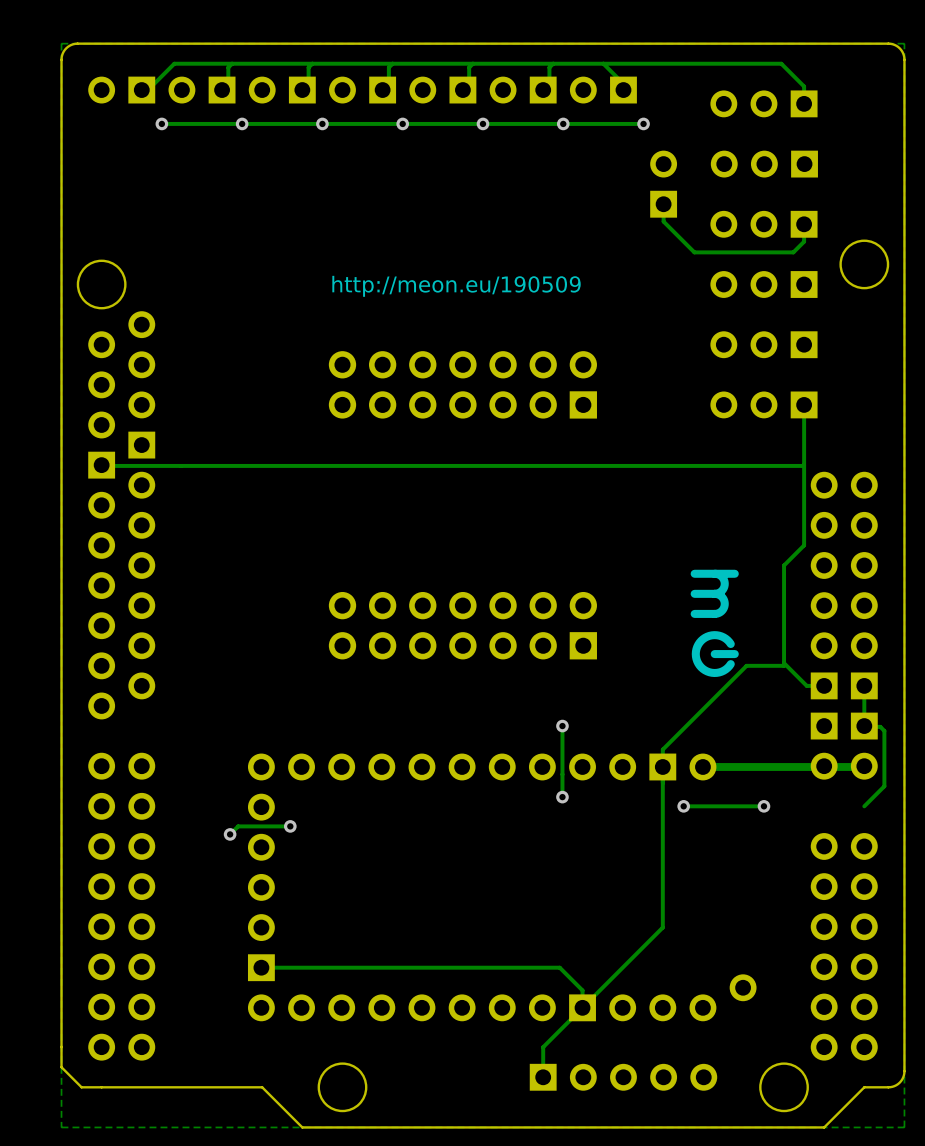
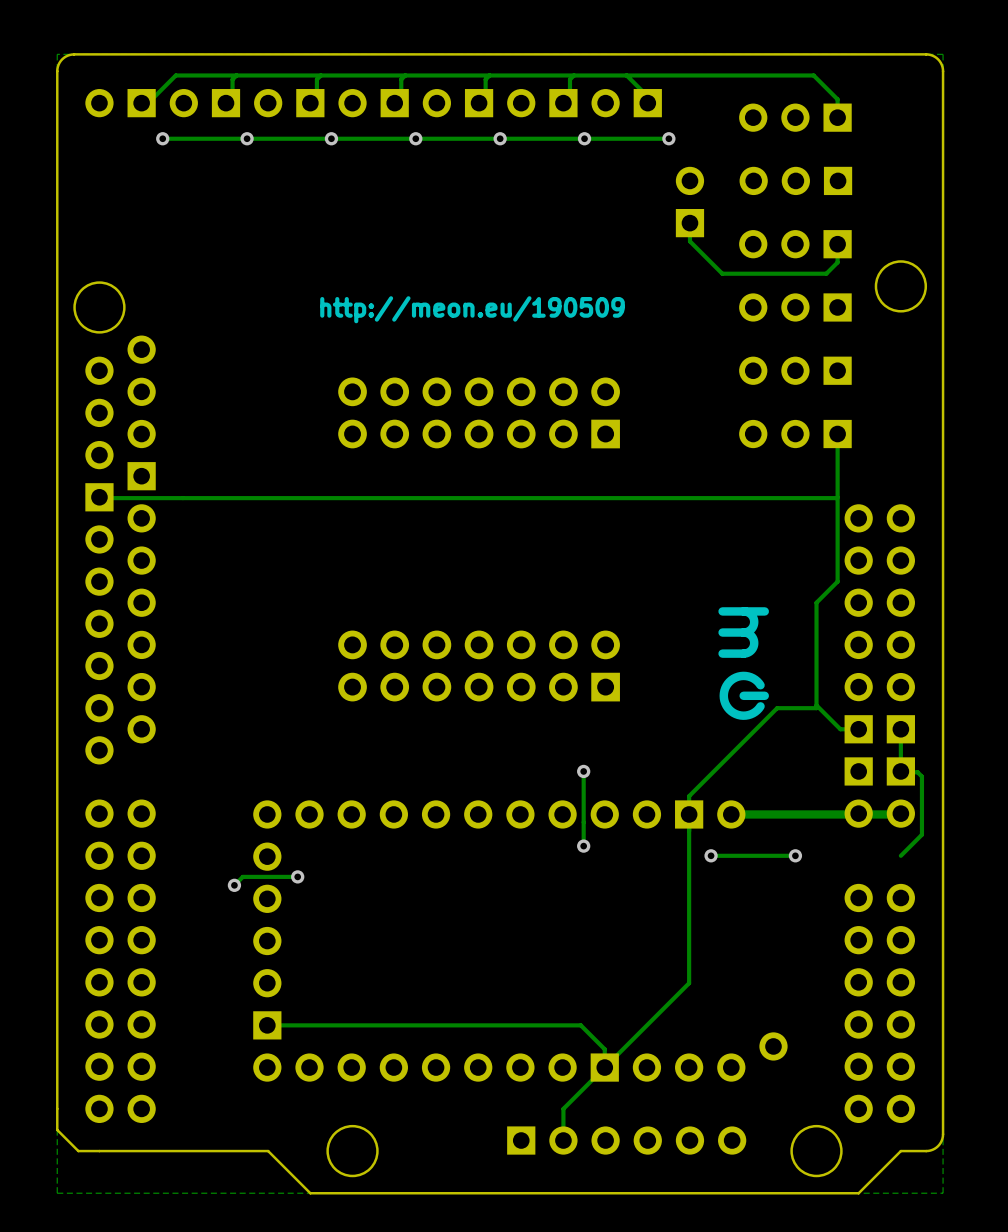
part: none -> (626, 1140)
part: (623, 1077) -> none

